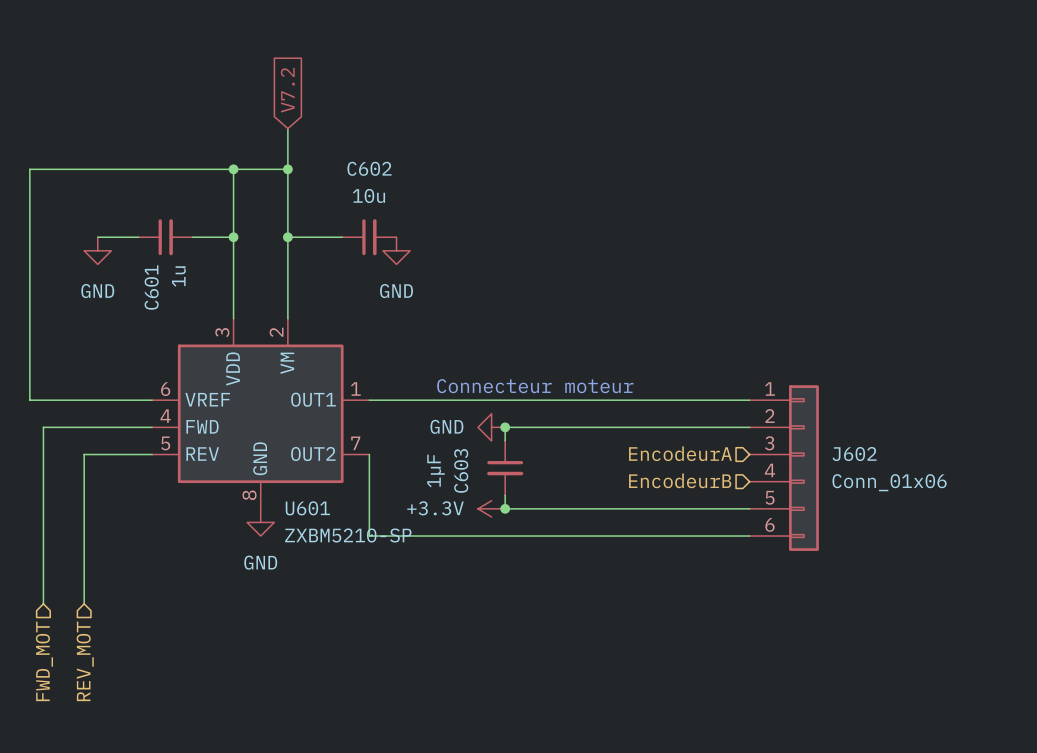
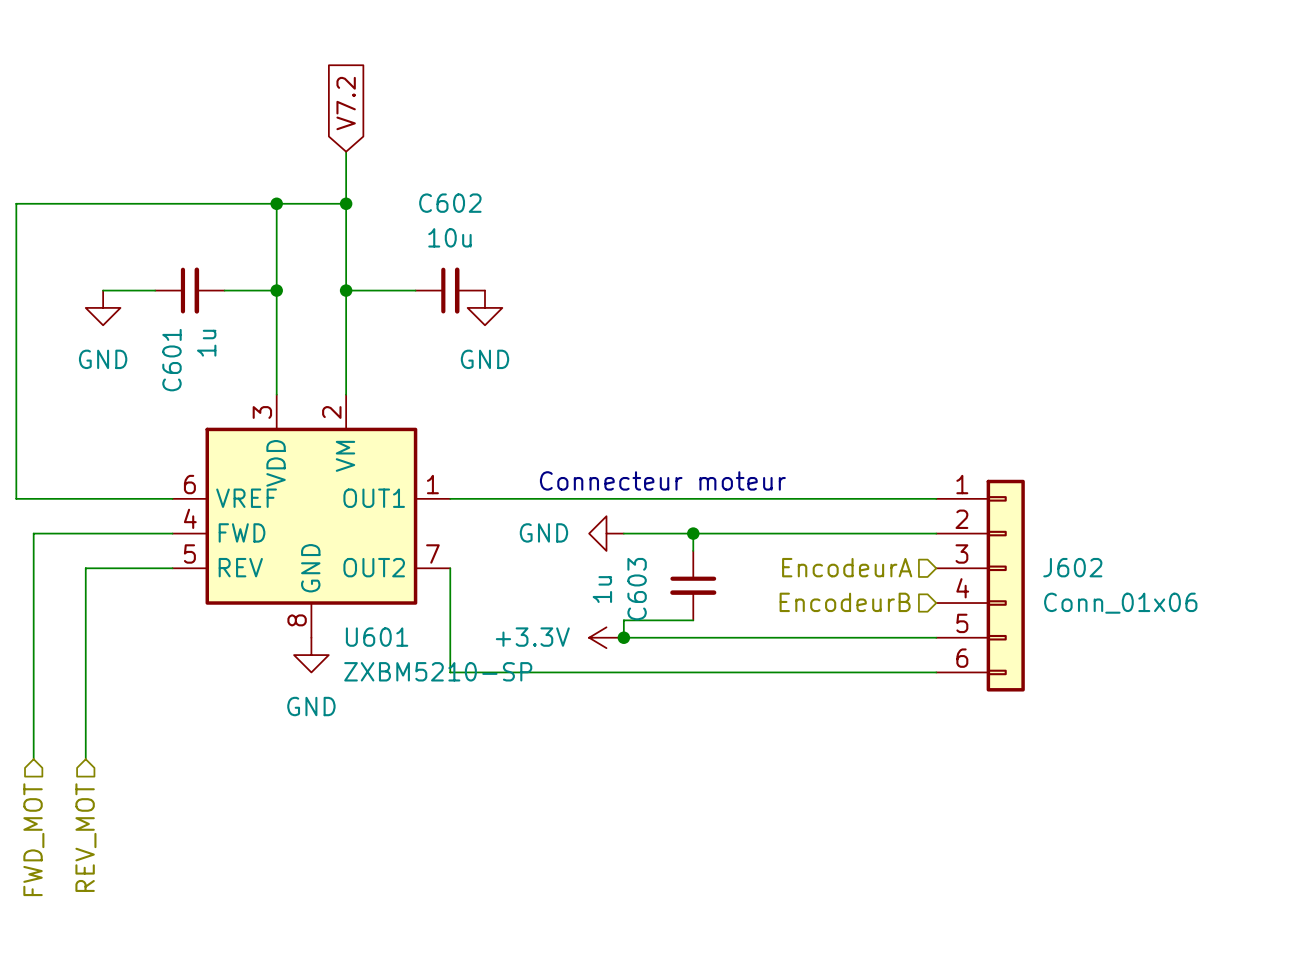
wire: (505, 427) (505, 440) -> (693, 533) (693, 550)
junction position: (505, 427) -> (693, 533)
C603 position: (505, 468) -> (693, 585)
C603 value: 1µF (435, 470) -> 1u (602, 589)
wire: none -> (623, 620) (693, 620)

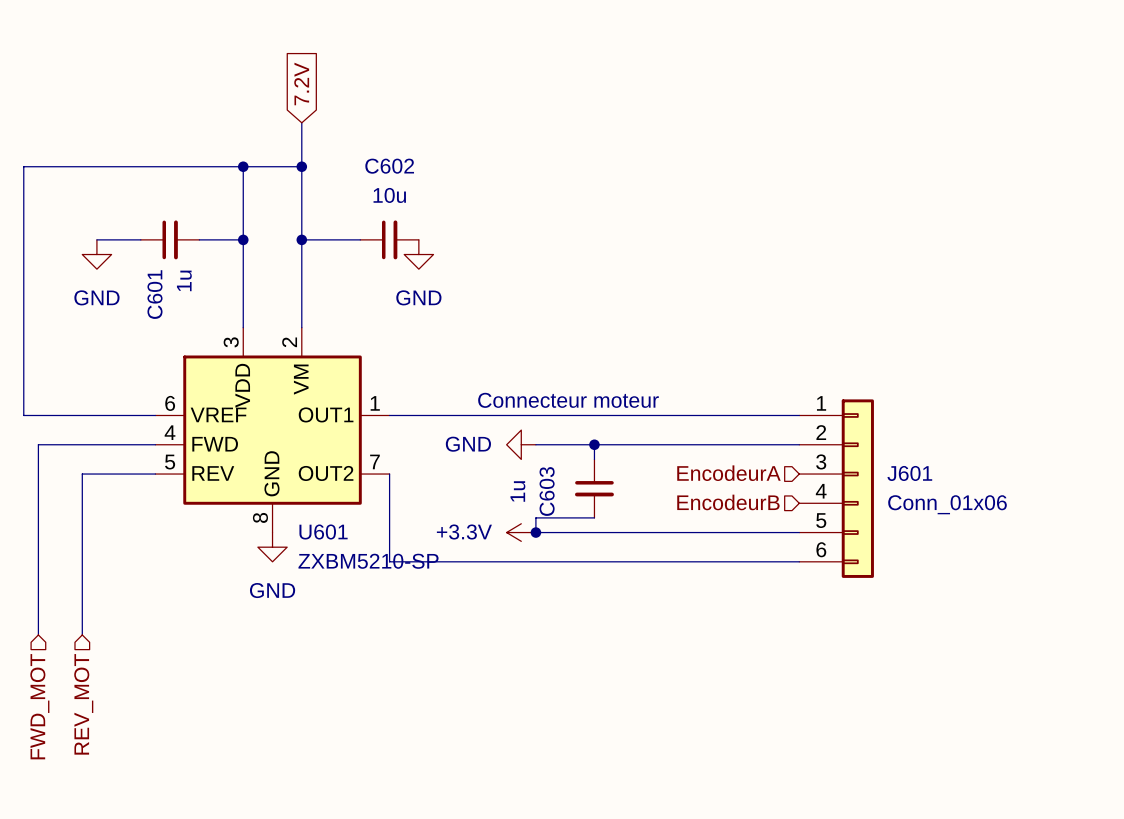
global label: V7.2 (346, 103) -> 7.2V (301, 83)
J602 name: J602 (1072, 567) -> J601 (909, 473)

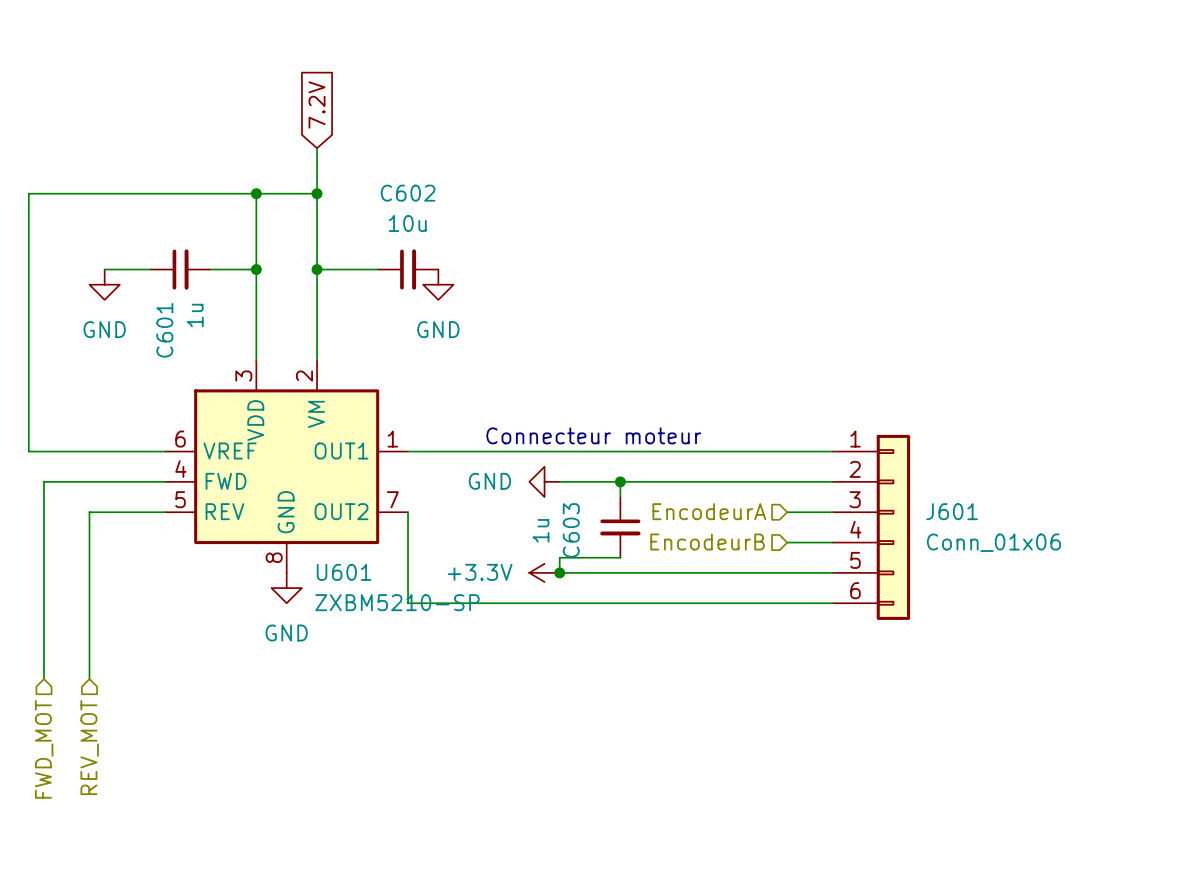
hierarchical label position: EncodeurA (728, 473) -> EncodeurA (709, 511)
wire: none -> (787, 512) (832, 512)
hierarchical label position: EncodeurB (728, 502) -> EncodeurB (707, 542)
wire: none -> (787, 542) (832, 542)

